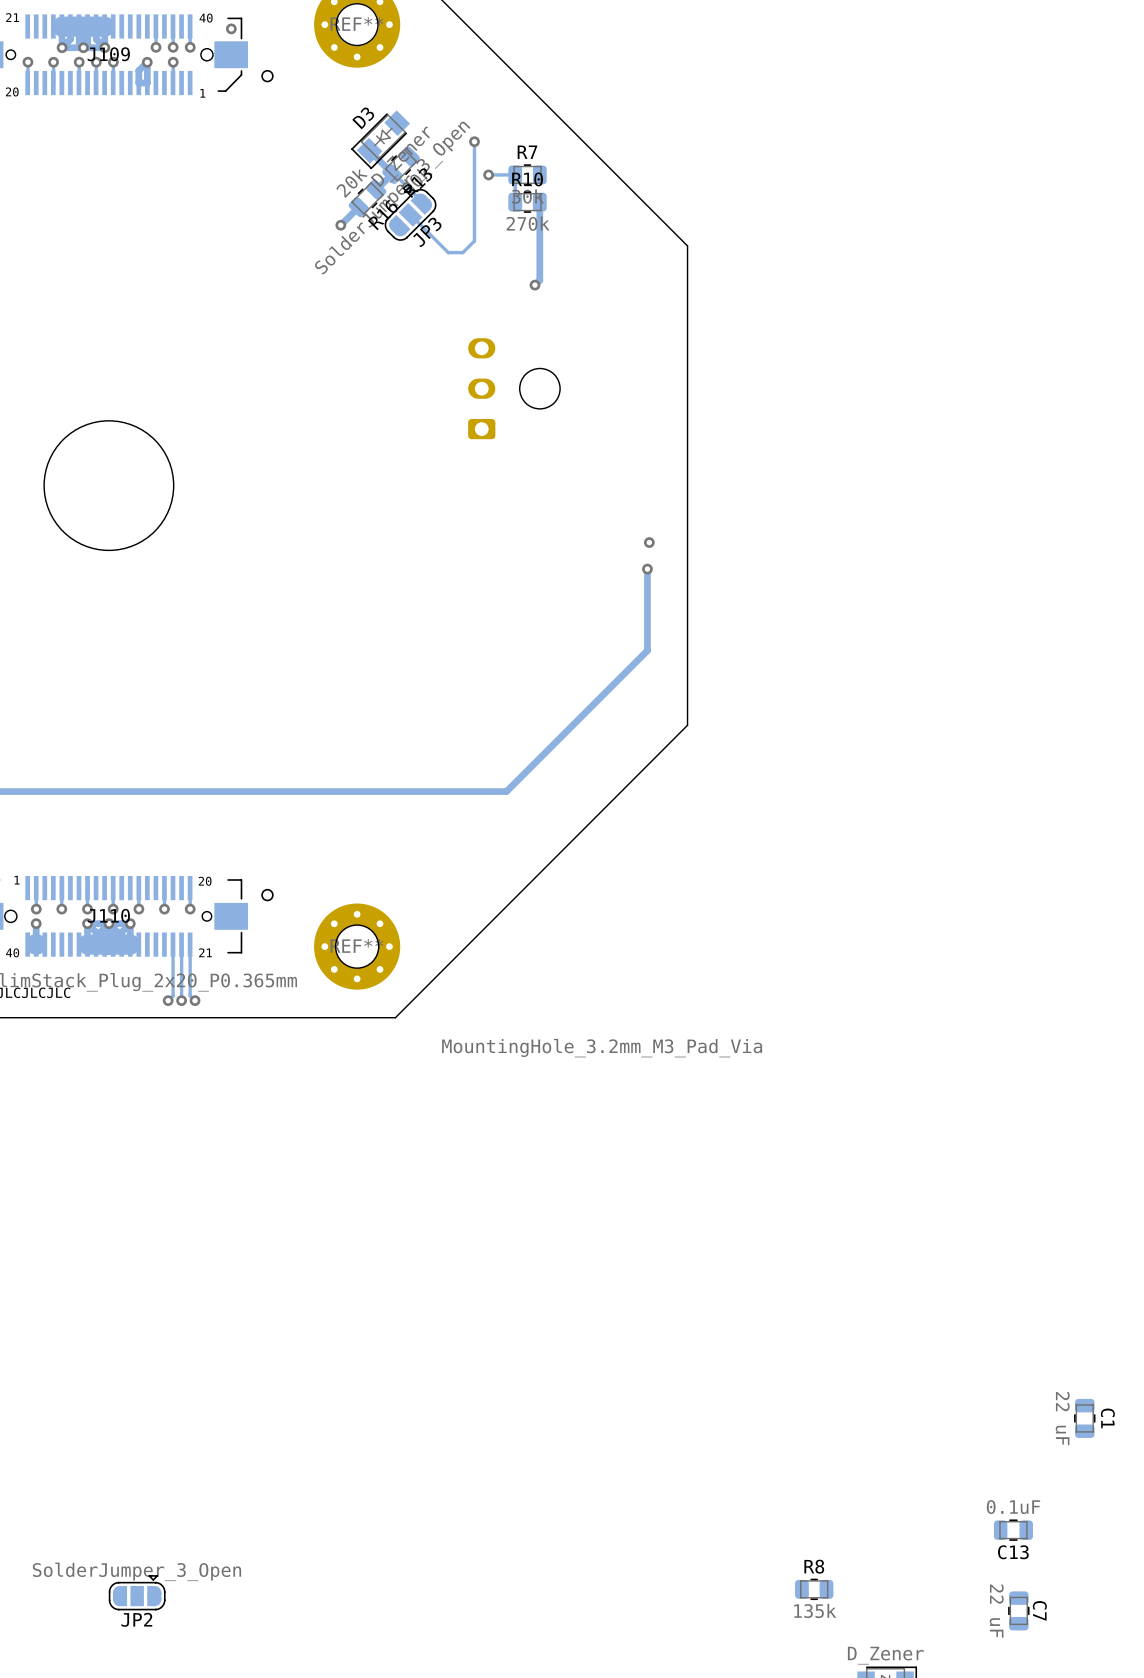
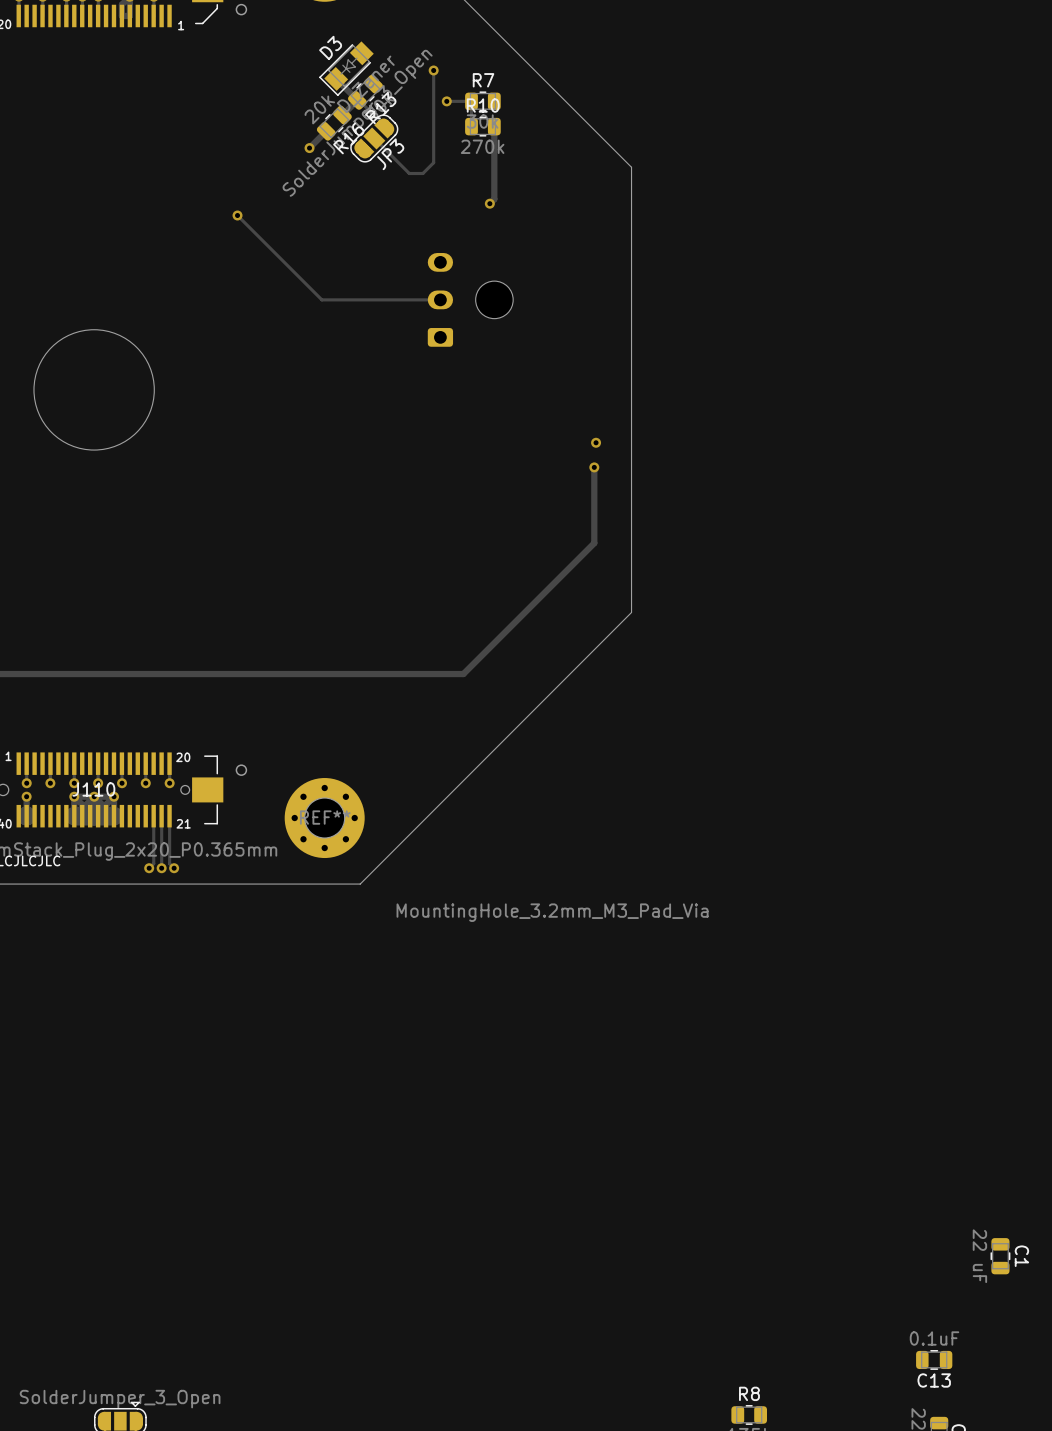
track: none -> (237, 215) (321, 299) (440, 299)
via: none -> (237, 215)

